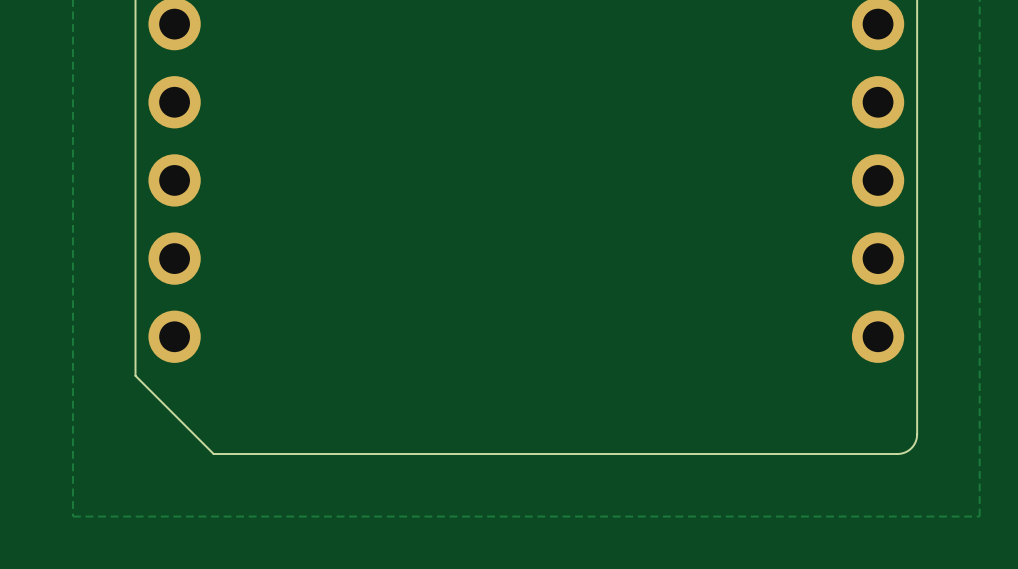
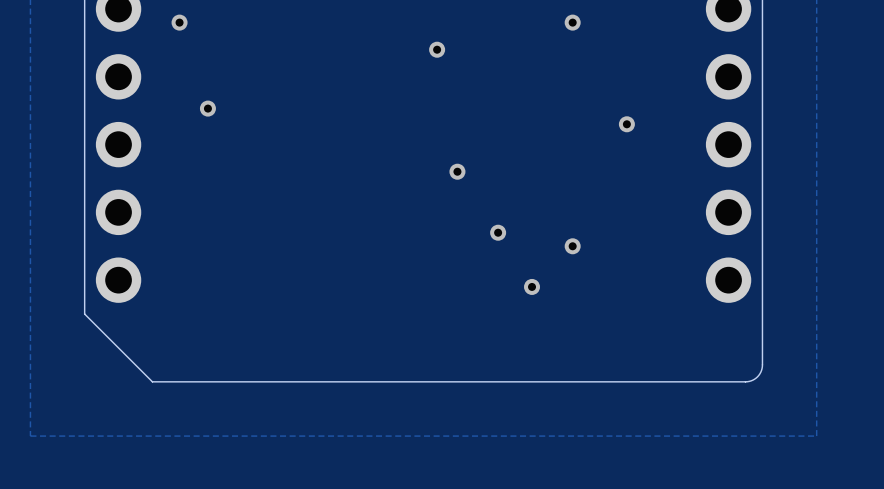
via: none -> (179, 22)
via: none -> (572, 22)
via: none -> (437, 49)
via: none -> (207, 108)
via: none -> (626, 124)
via: none -> (457, 171)
via: none -> (498, 232)
via: none -> (572, 246)
via: none -> (532, 286)

